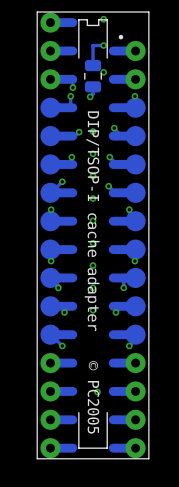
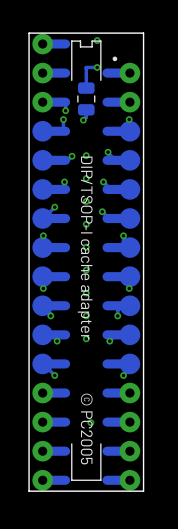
via: (103, 72) -> none

